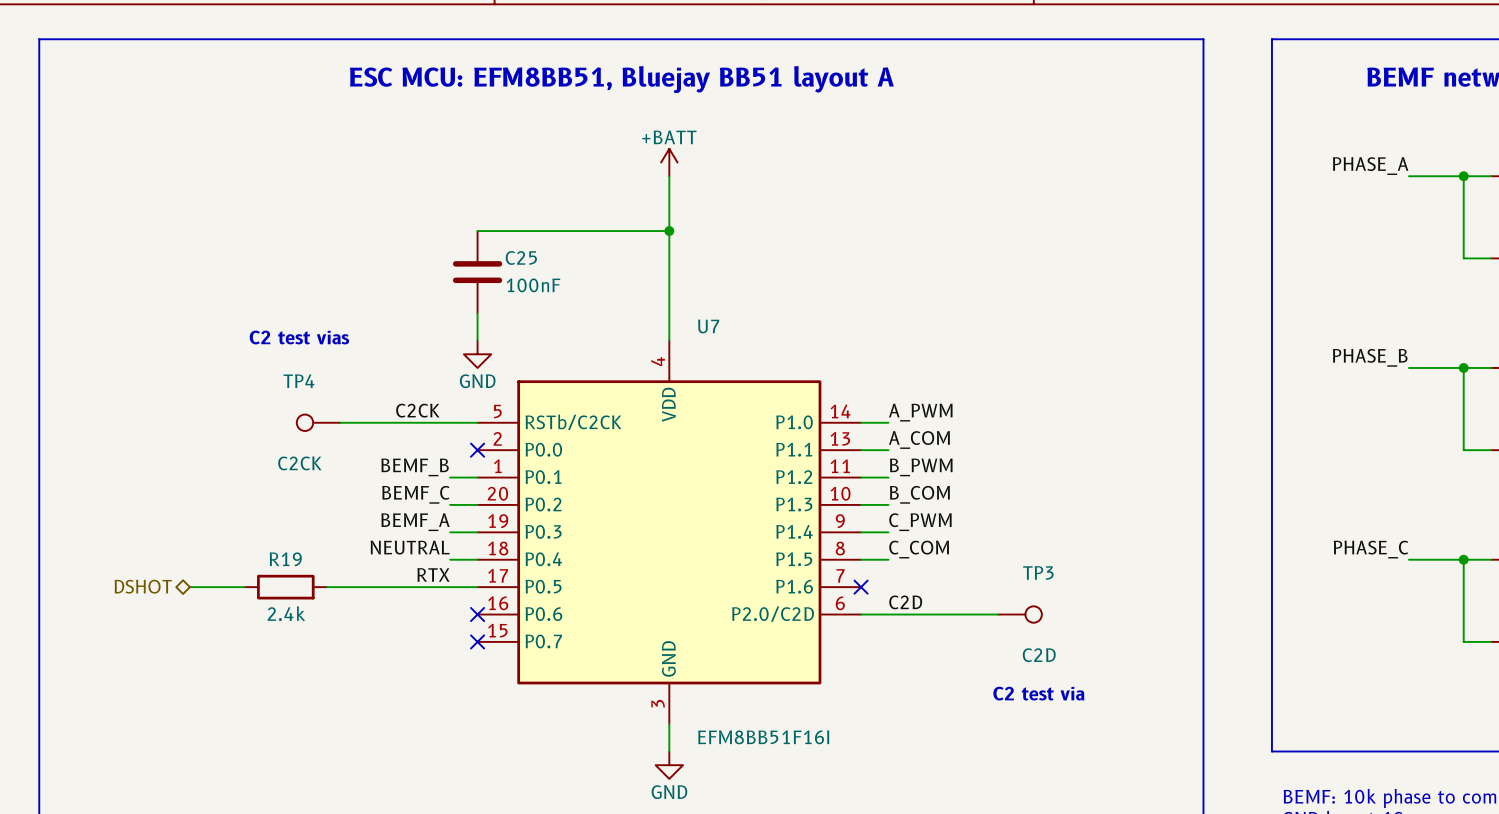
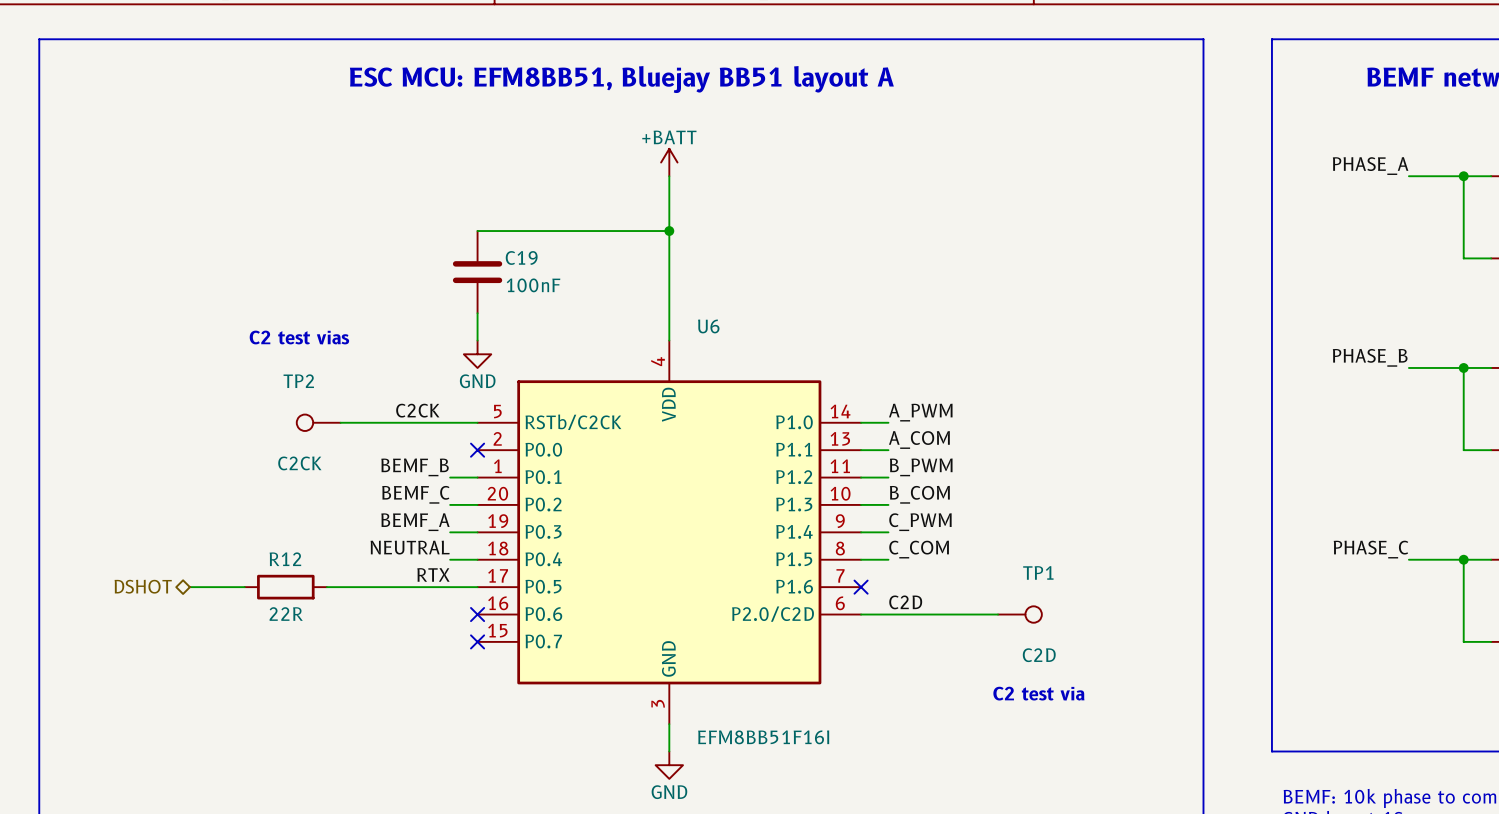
C25 name: C25 (521, 257) -> C19 (521, 257)
U7 name: U7 (708, 326) -> U6 (708, 326)
TP4 name: TP4 (298, 381) -> TP2 (298, 381)
R19 name: R19 (285, 559) -> R12 (285, 559)
TP3 name: TP3 (1038, 572) -> TP1 (1038, 572)
R19 value: 2.4k (286, 613) -> 22R (286, 614)

